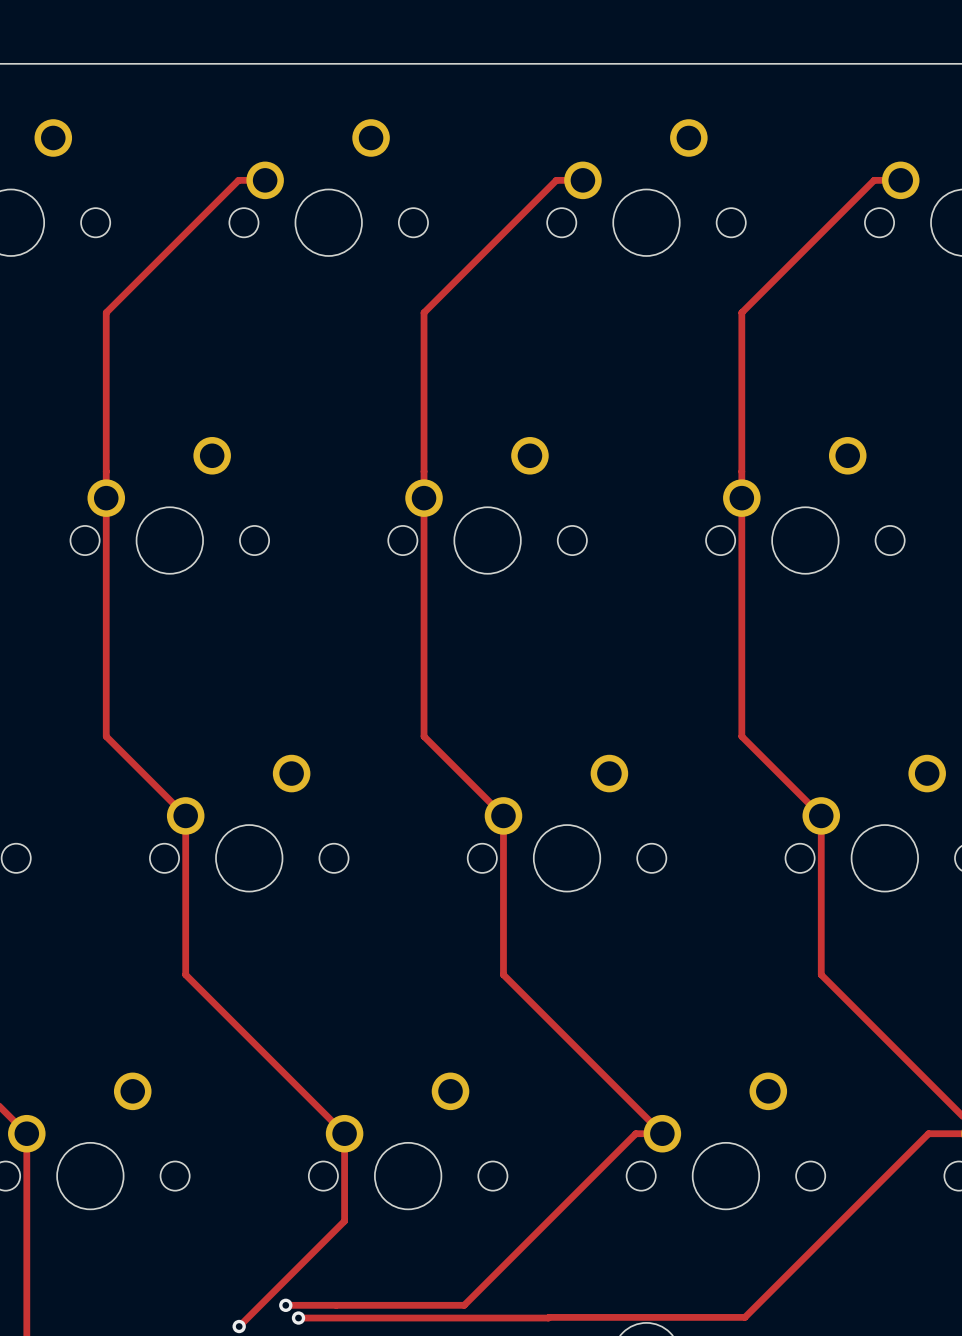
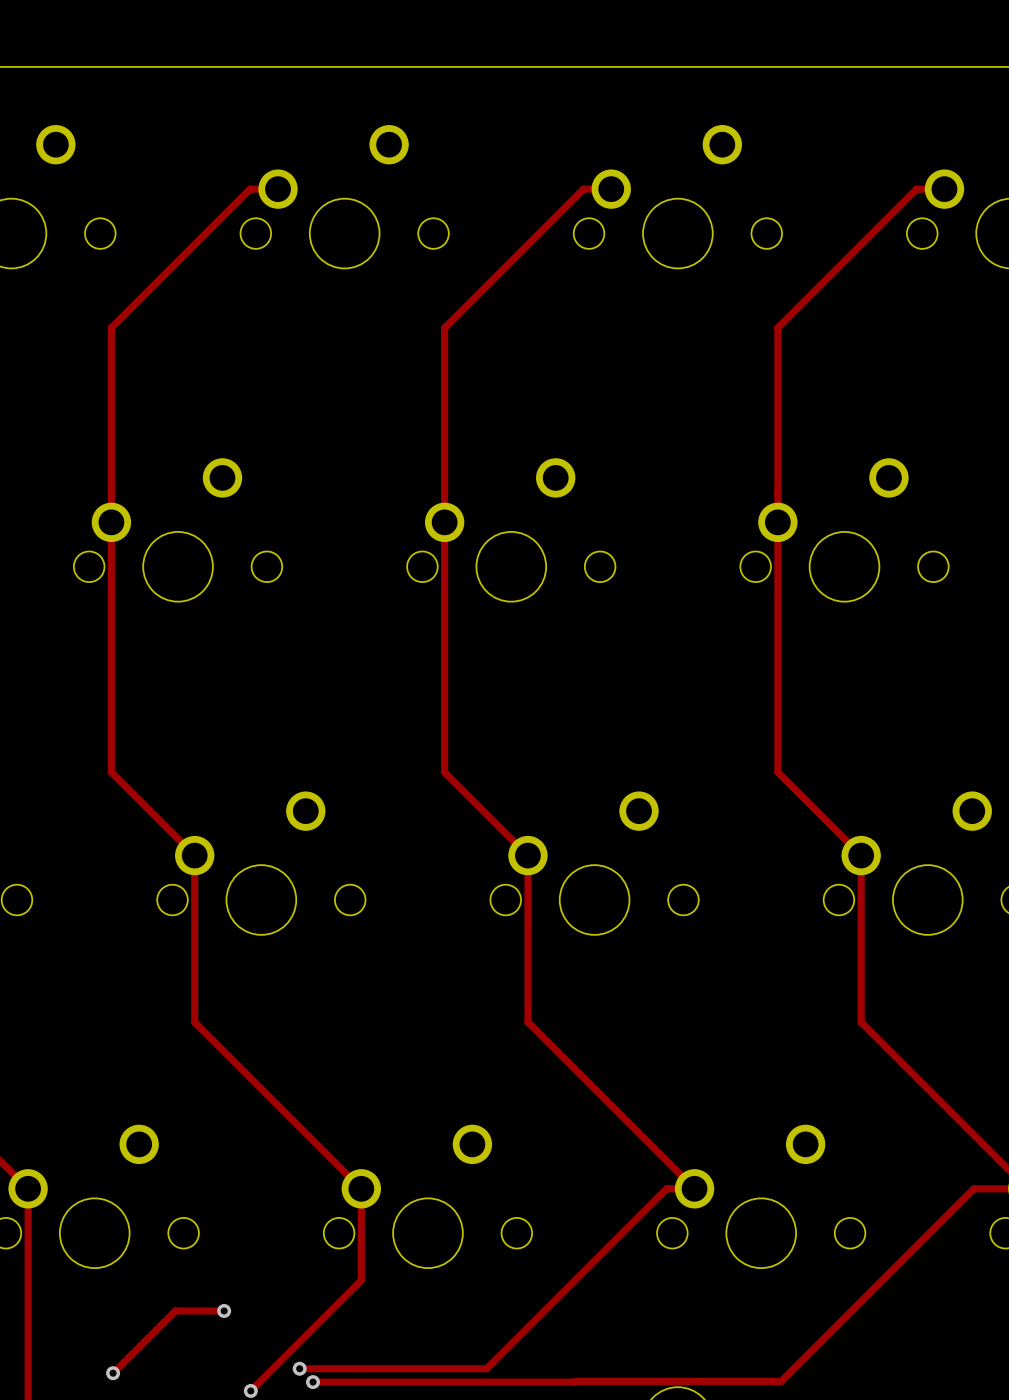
track: none -> (224, 1310) (175, 1310) (113, 1373)
via: none -> (224, 1310)
via: none -> (113, 1373)

